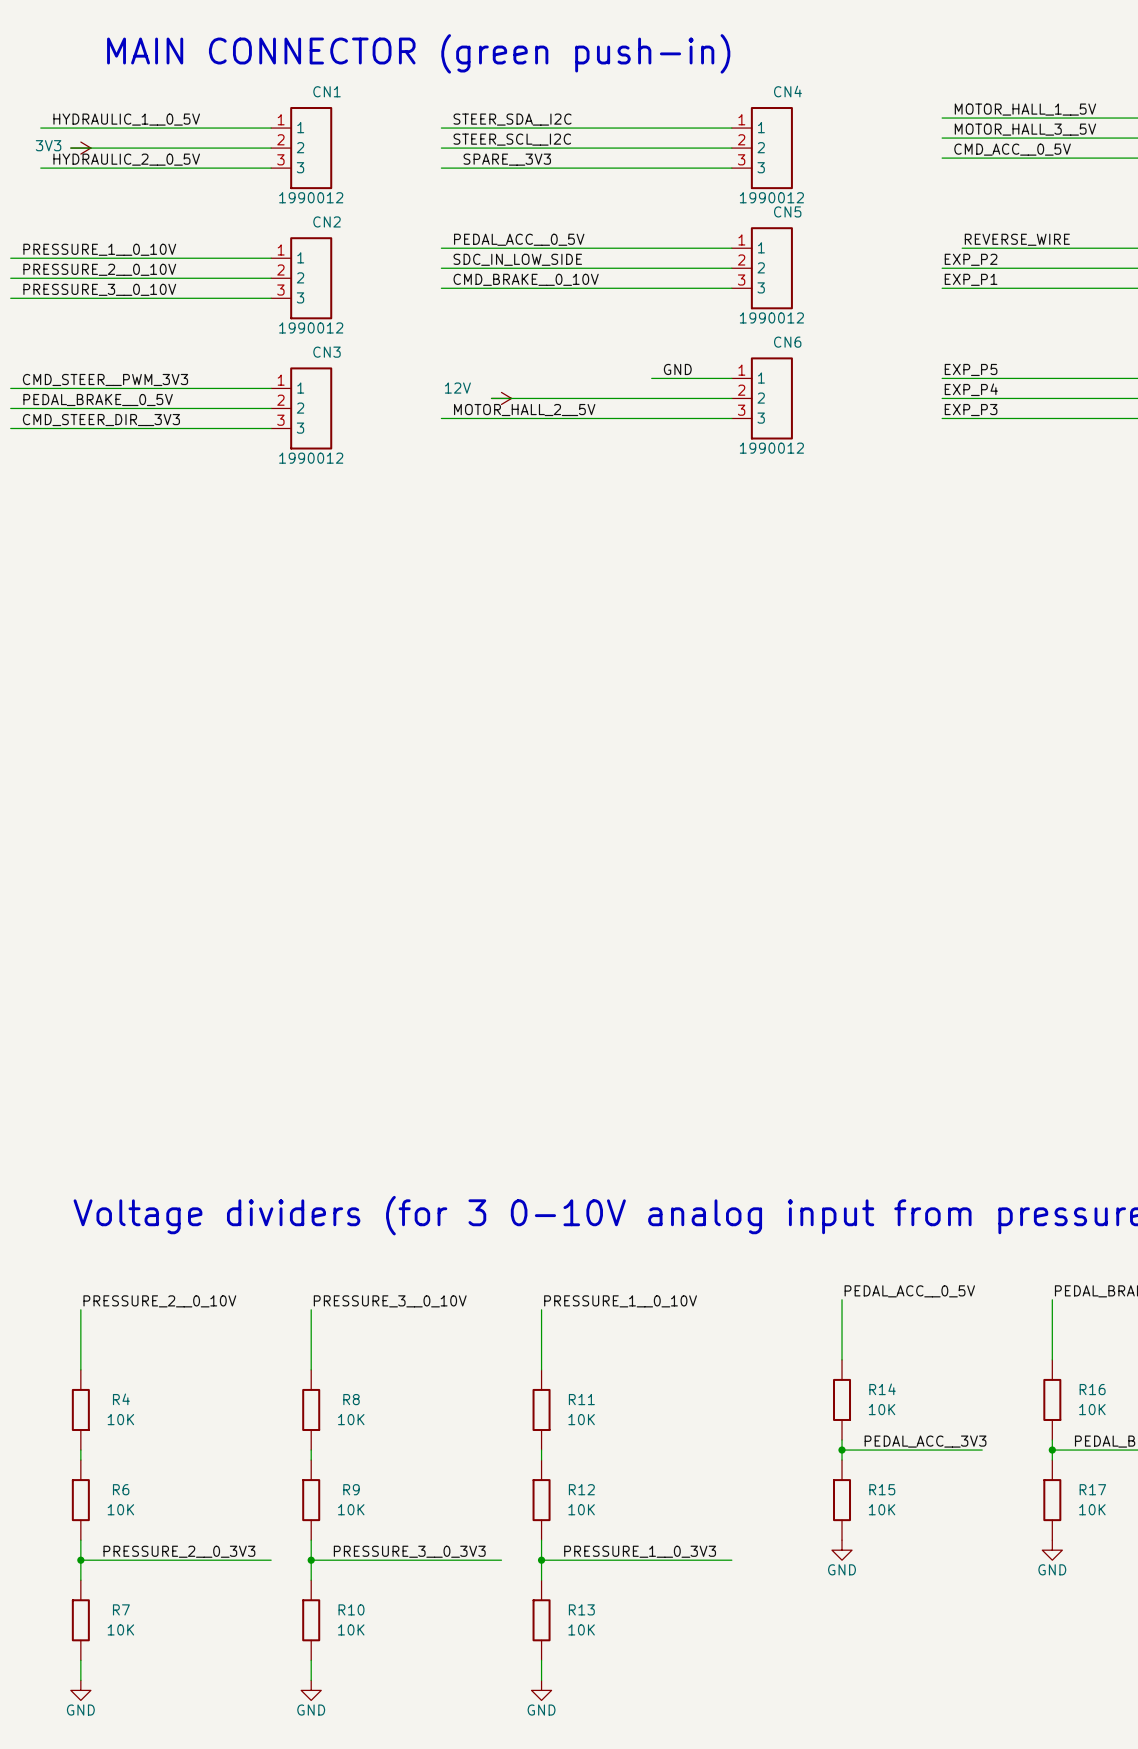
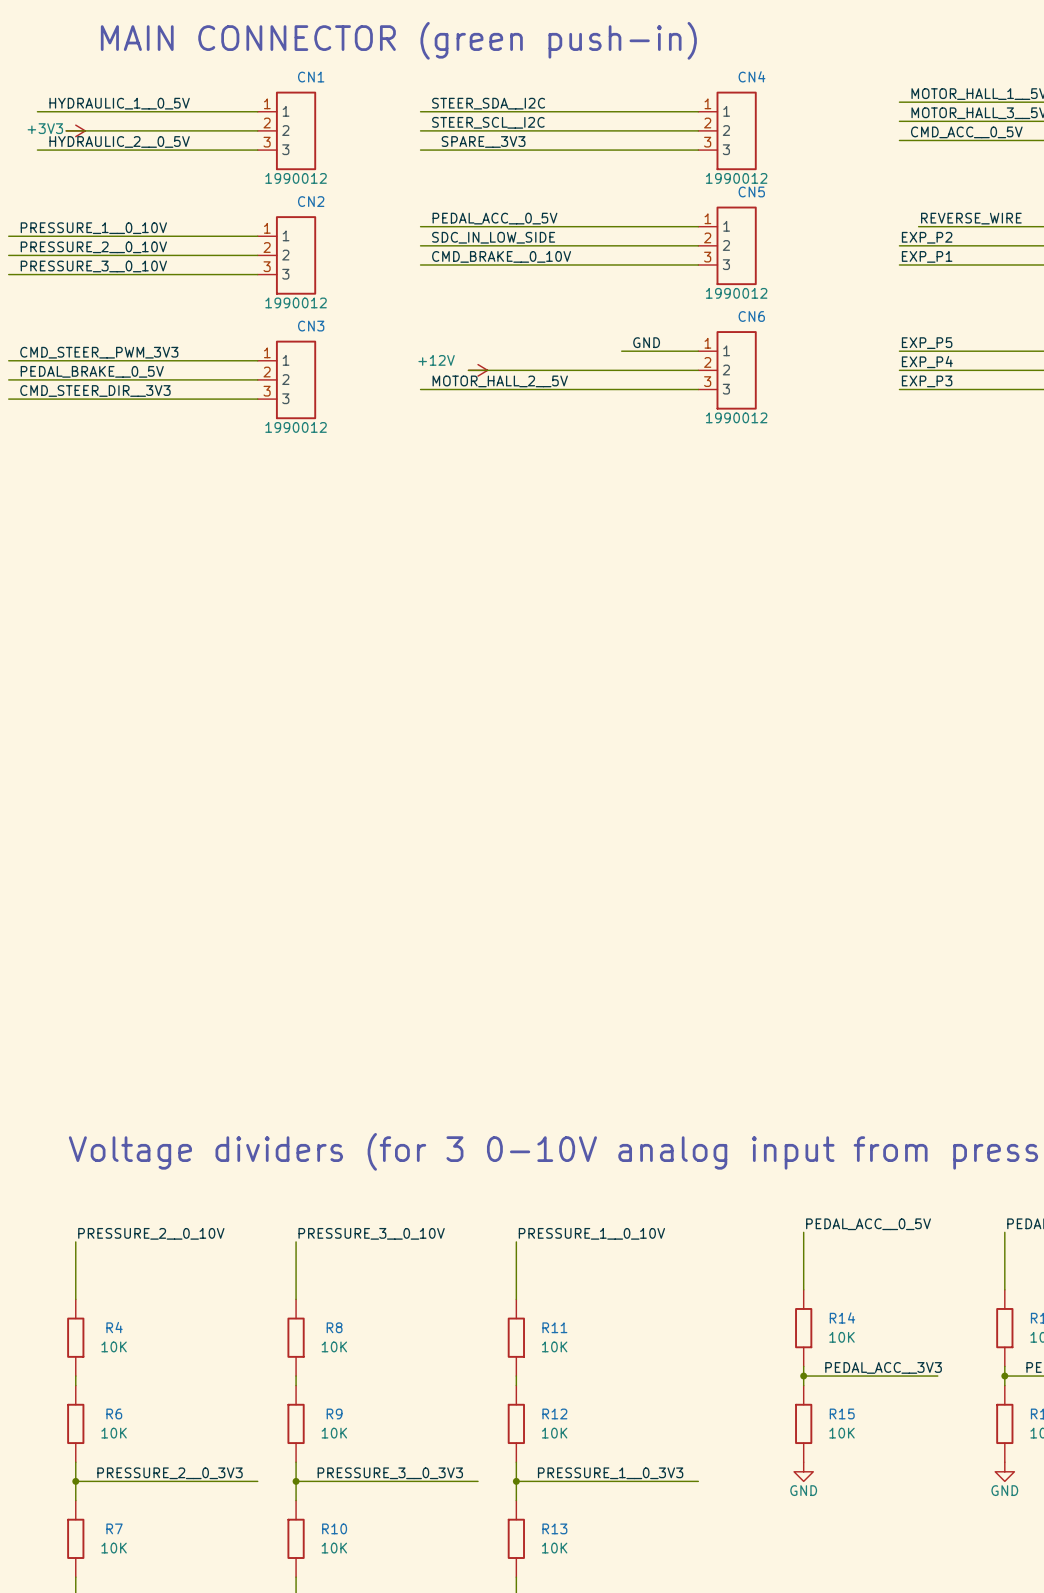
power symbol: 3V3 (80, 148) -> +3V3 (75, 130)
power symbol: 12V (501, 398) -> +12V (478, 370)

